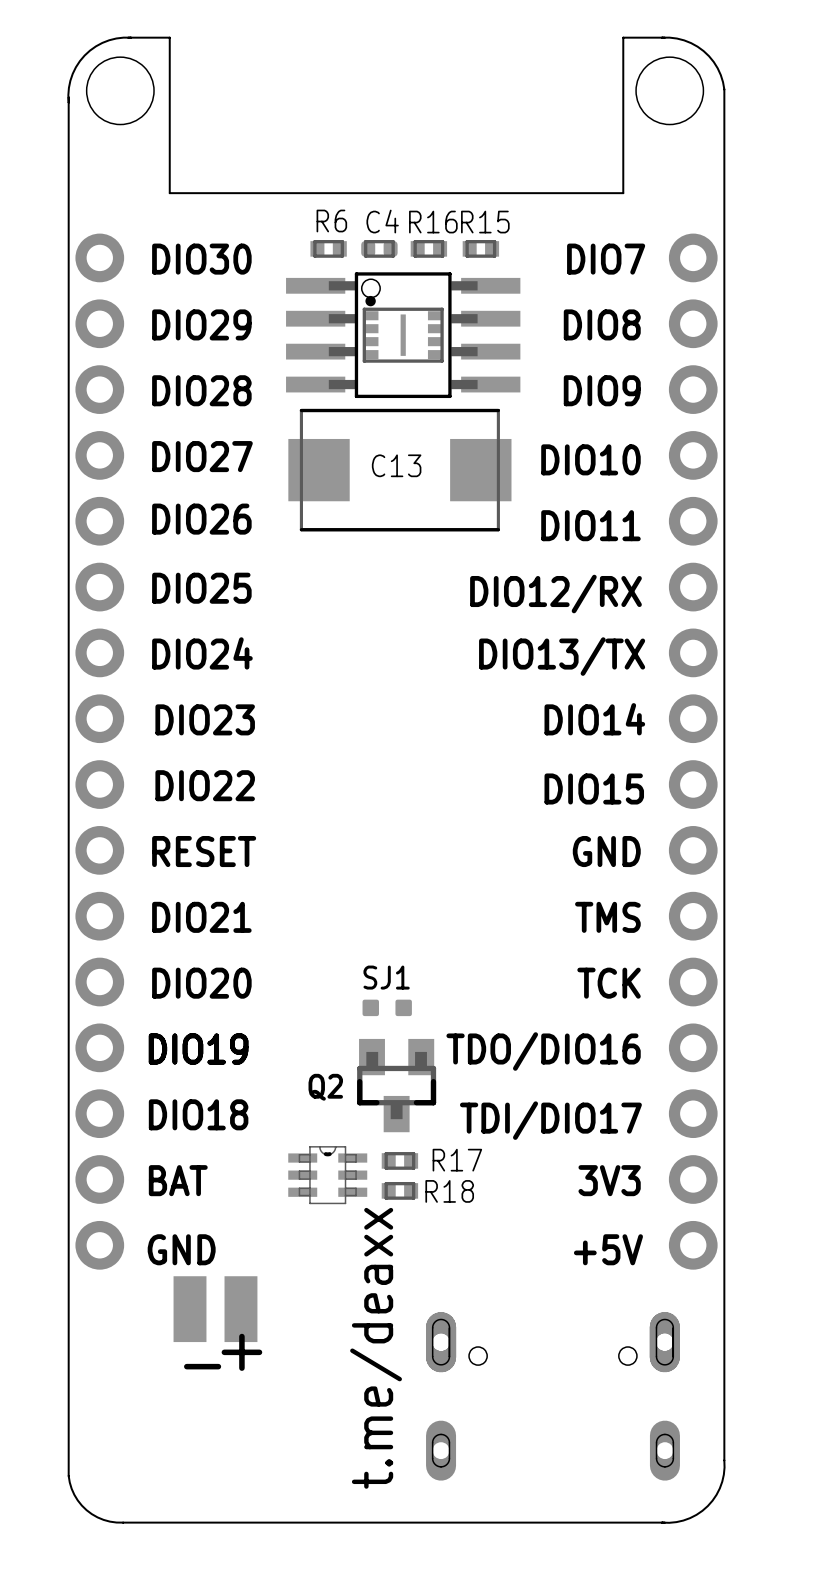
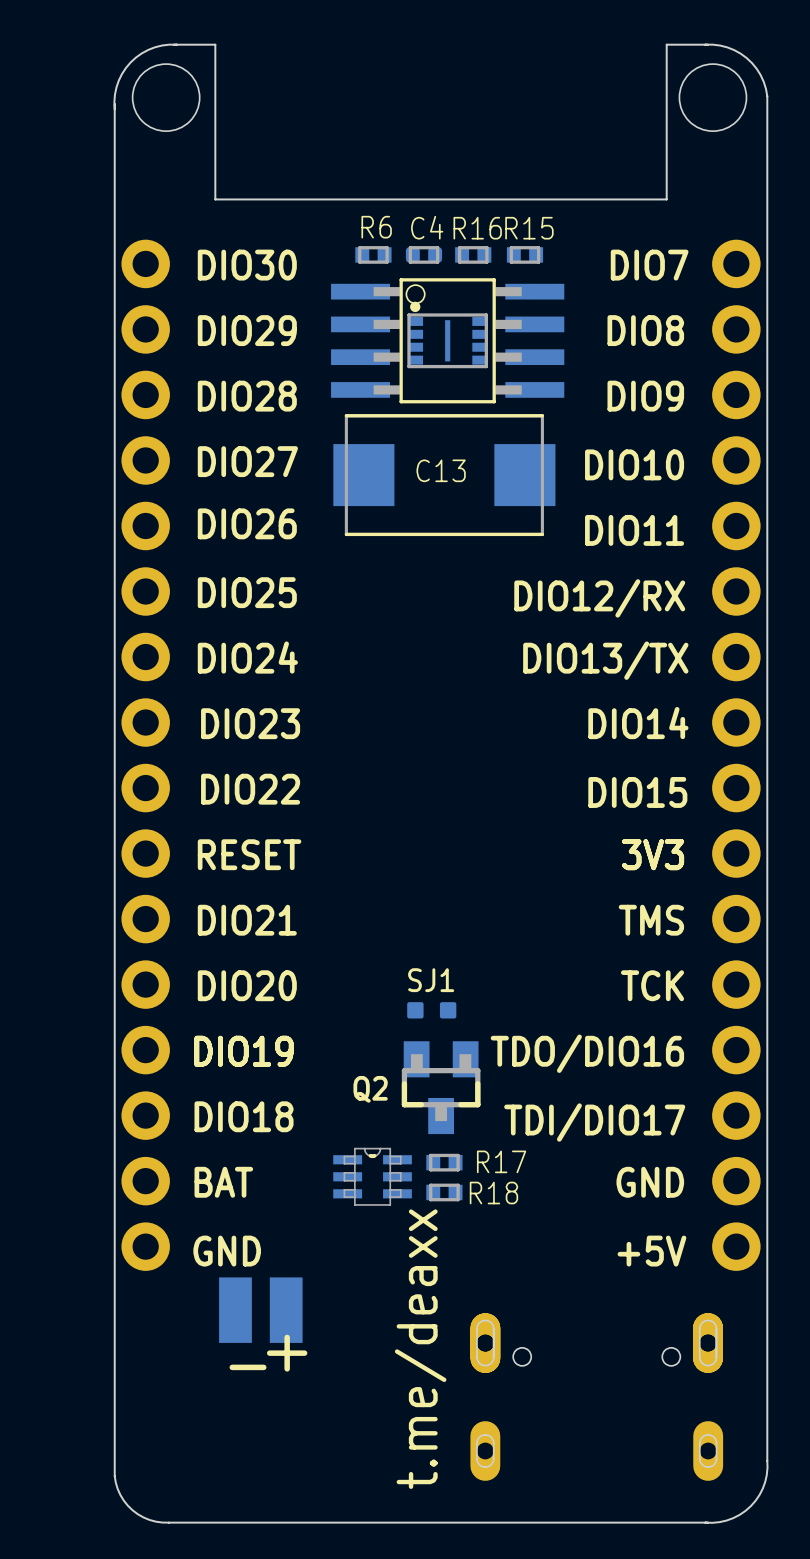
text: GND (606, 851) -> 3V3 (653, 854)
text: 3V3 (609, 1180) -> GND (650, 1182)

